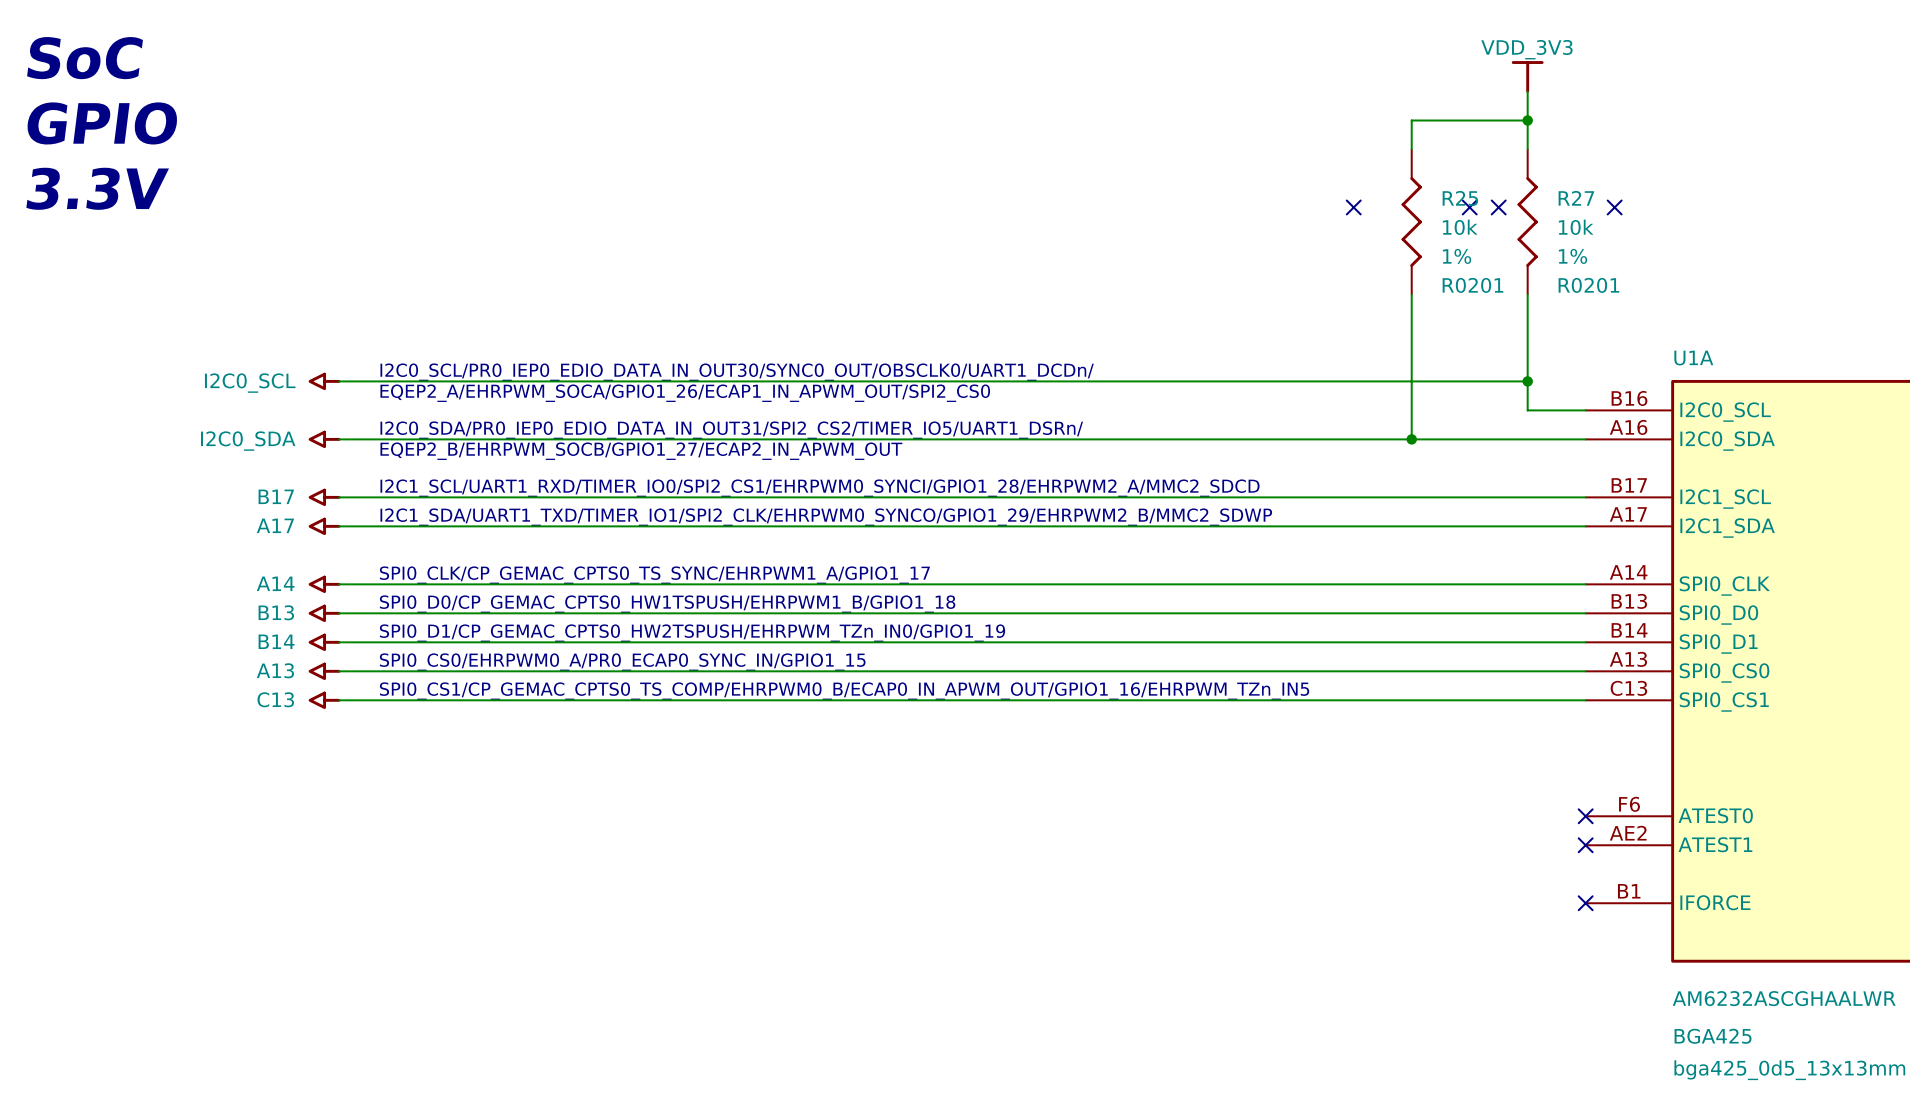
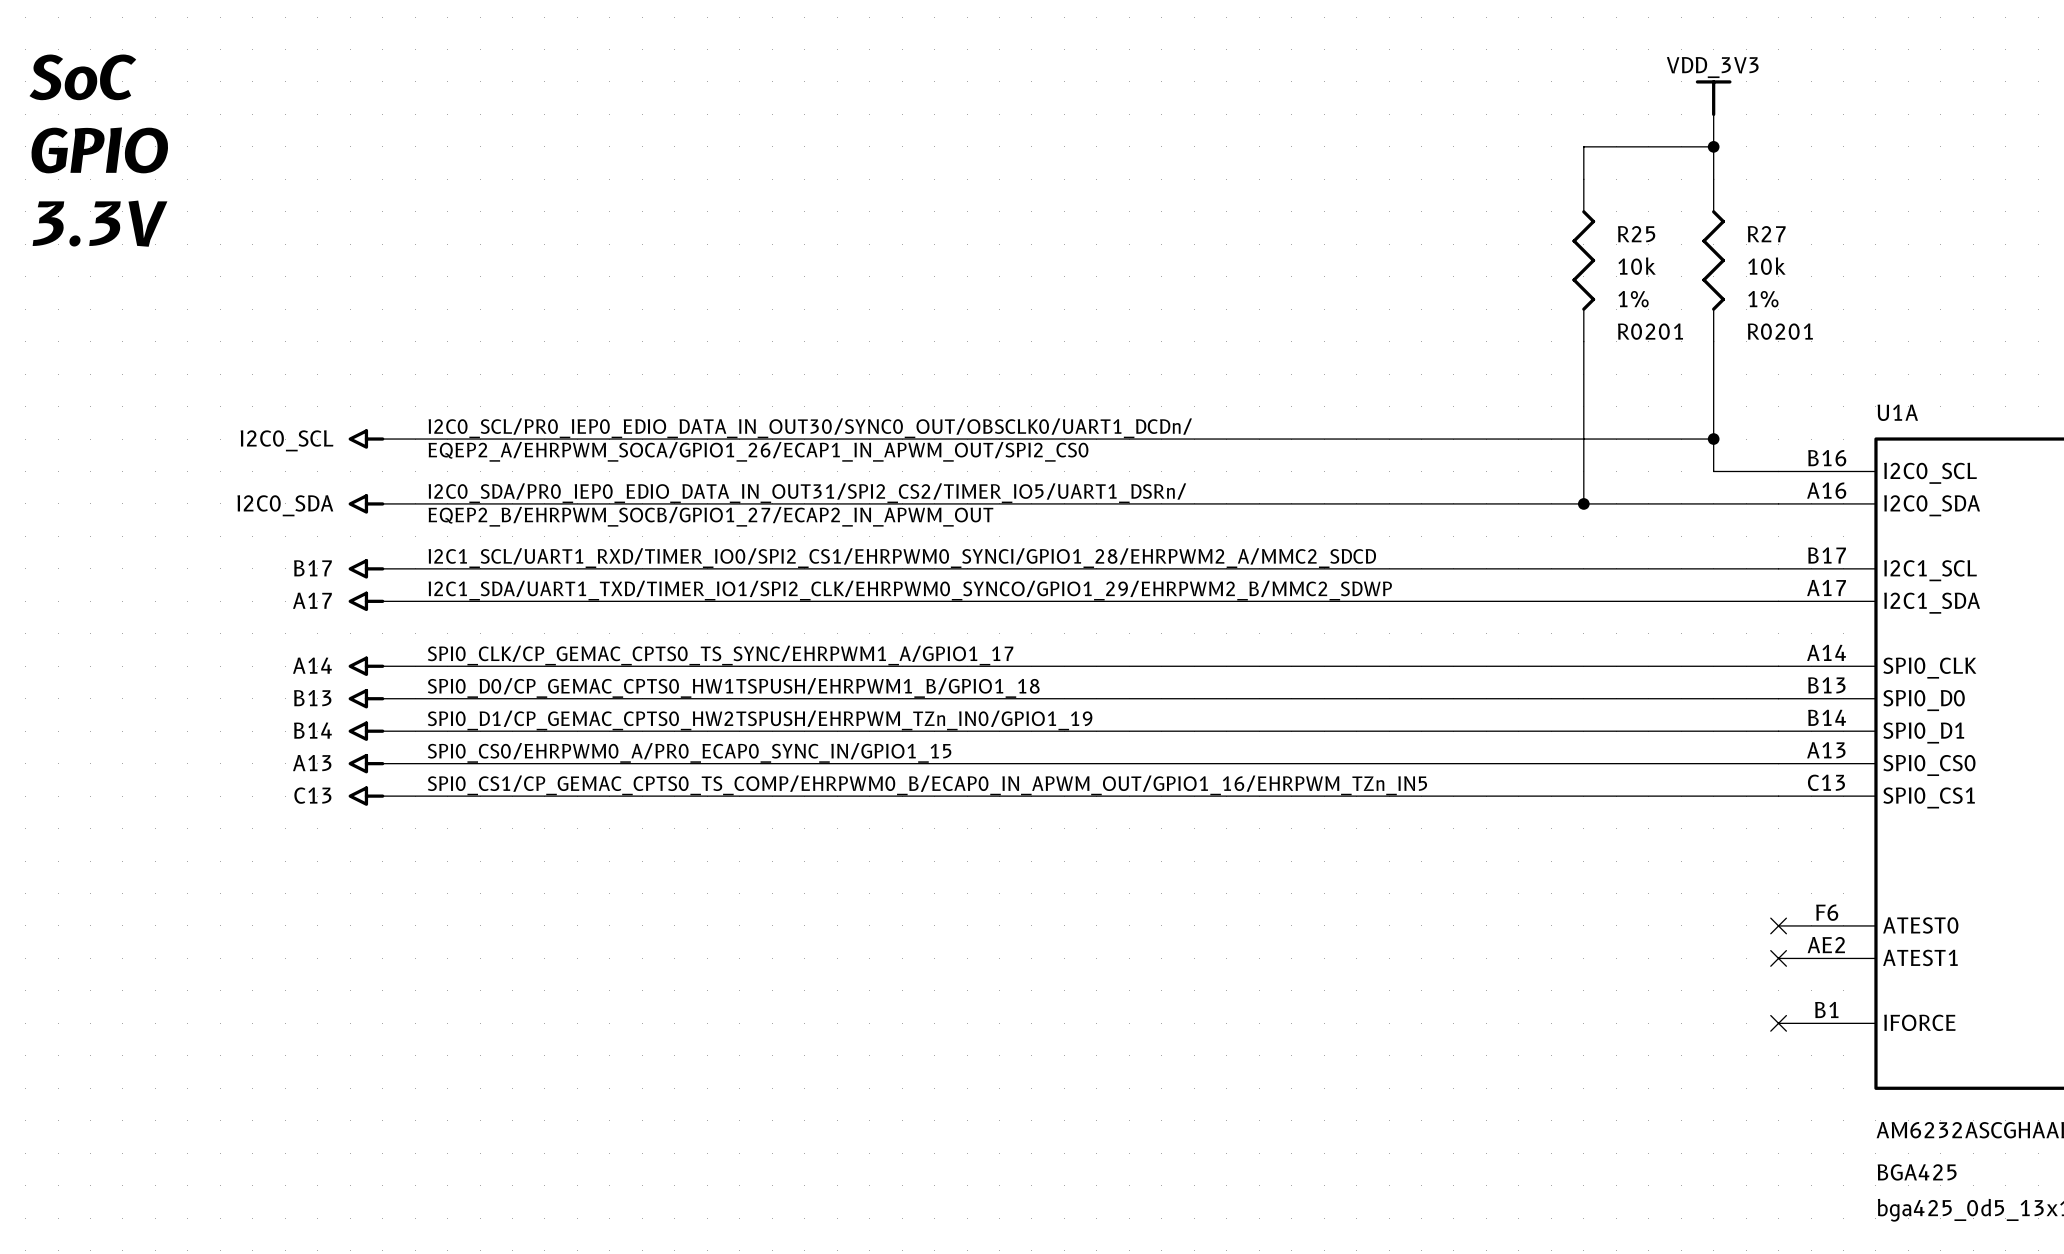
no-connect mark: (1353, 207) -> none
no-connect mark: (1469, 207) -> none
no-connect mark: (1498, 207) -> none
no-connect mark: (1614, 207) -> none

